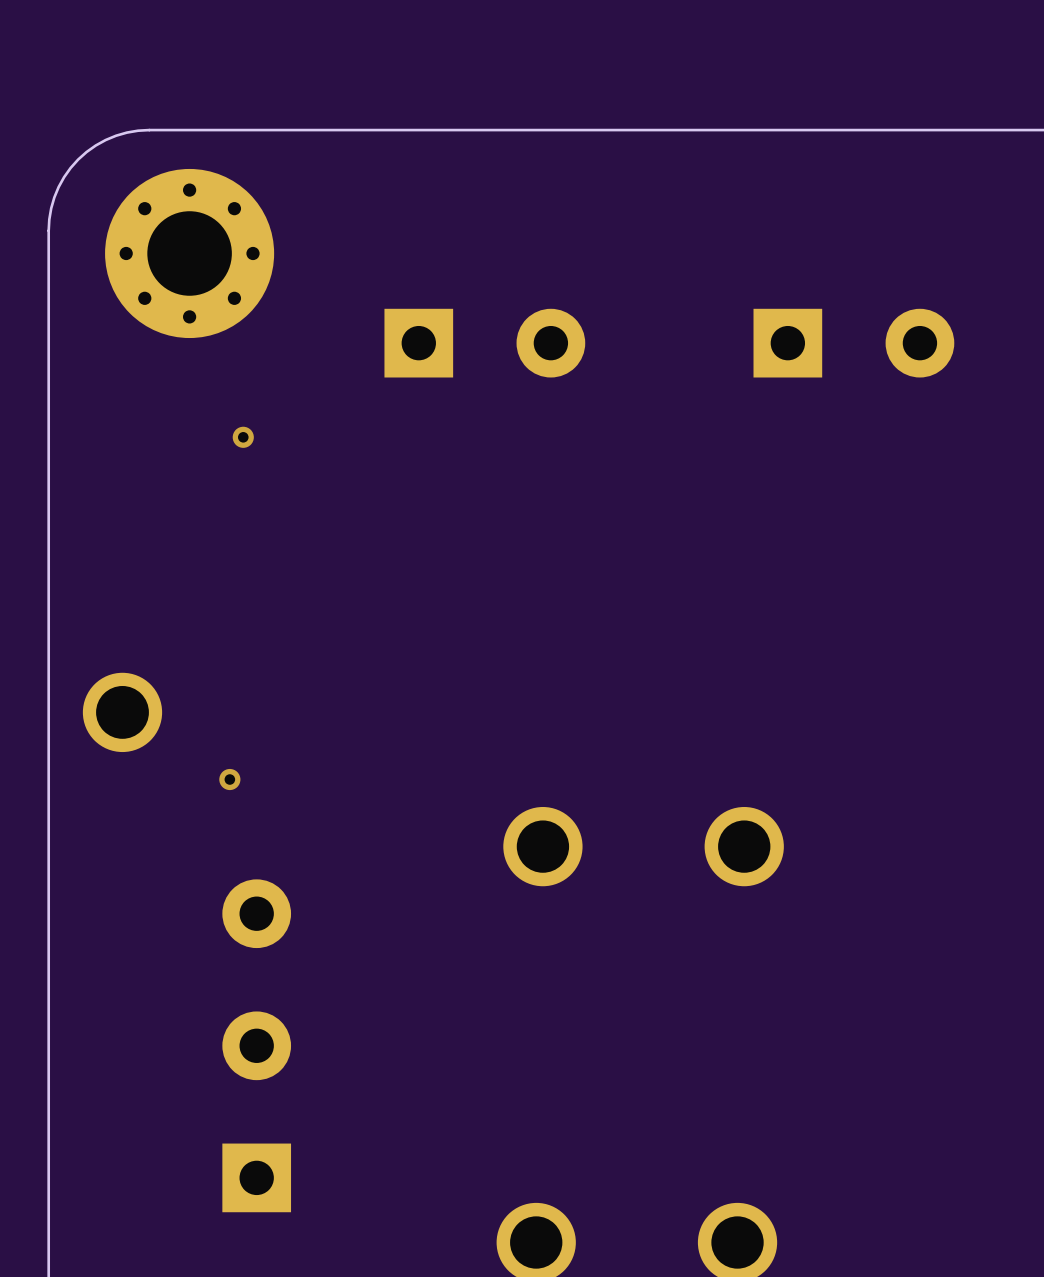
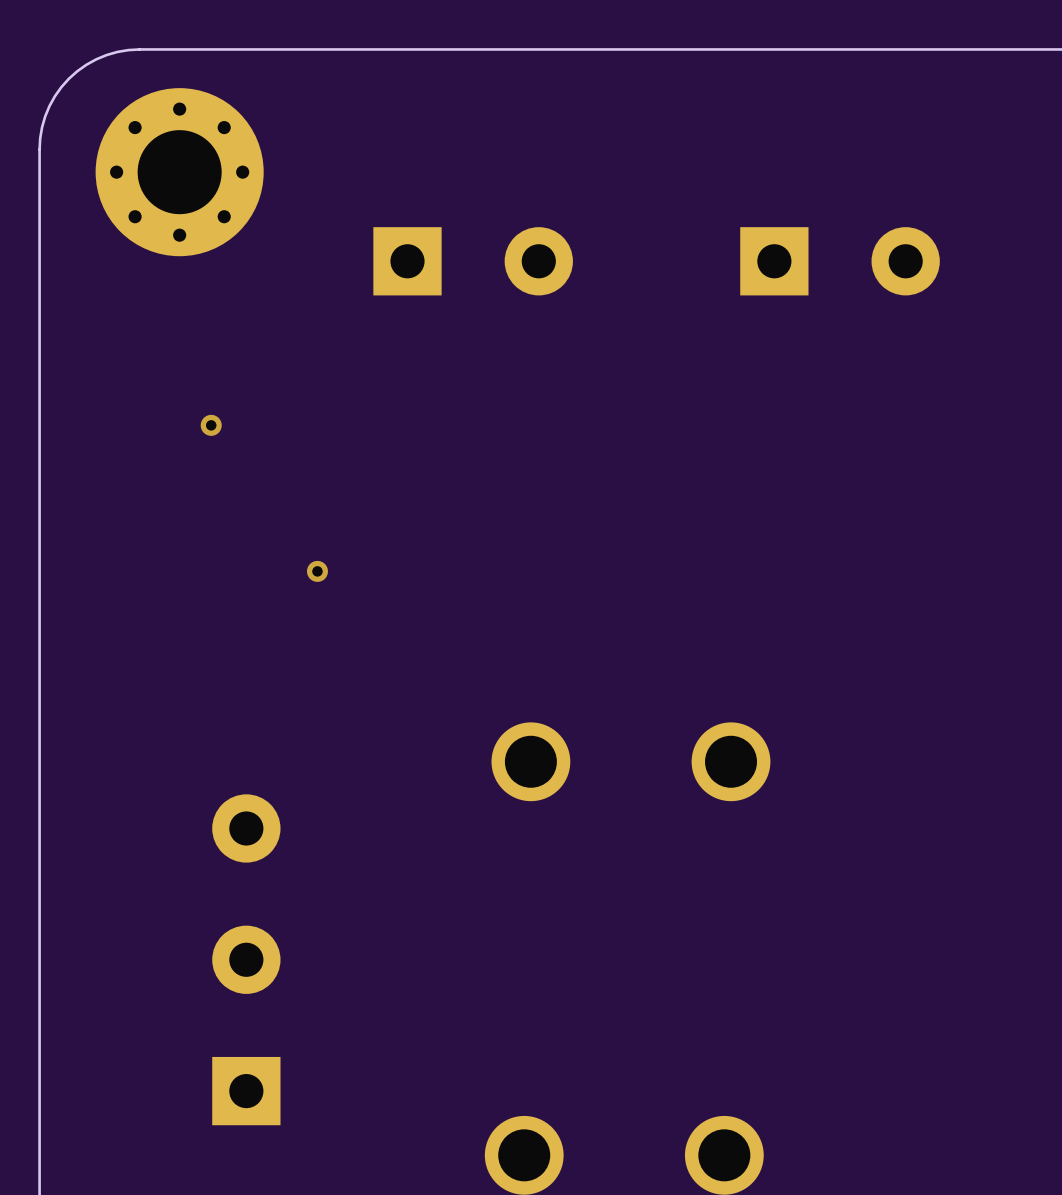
via position: (243, 437) -> (211, 425)
via: none -> (317, 571)
part: (122, 712) -> none
via: (229, 779) -> none

